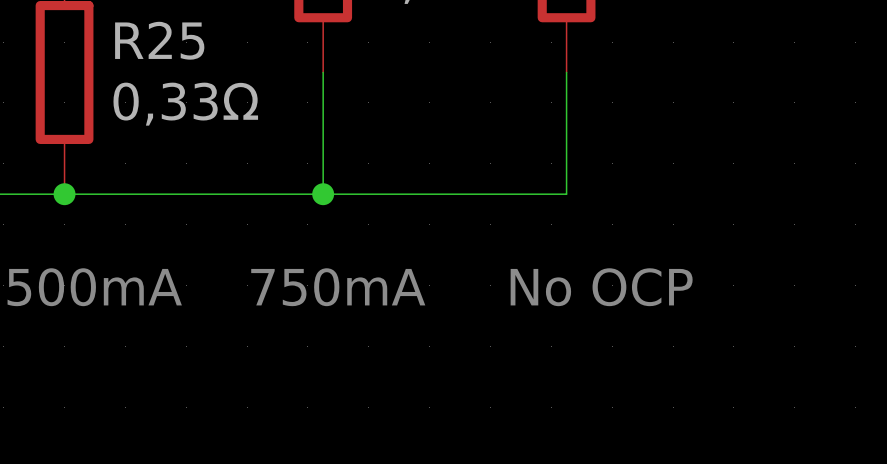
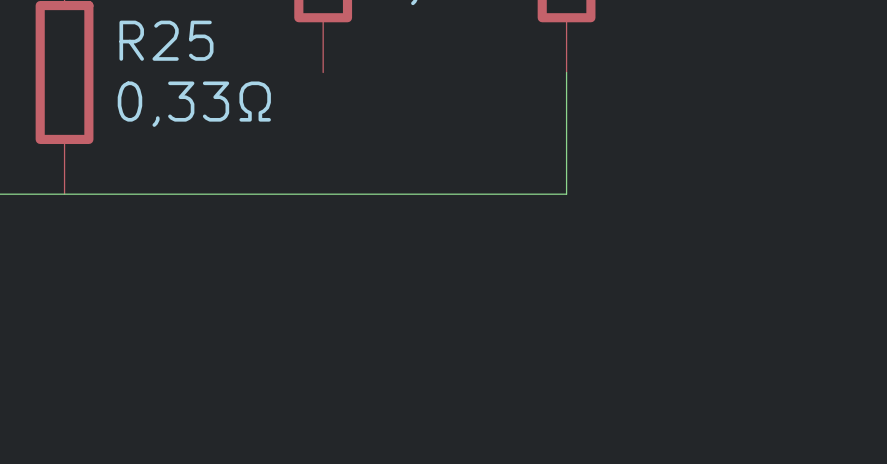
wire: (323, 72) (323, 194) -> none
junction: (64, 194) -> none
junction: (323, 194) -> none
text: 500mA (94, 287) -> none
text: 750mA (338, 287) -> none
text: No OCP (601, 287) -> none

